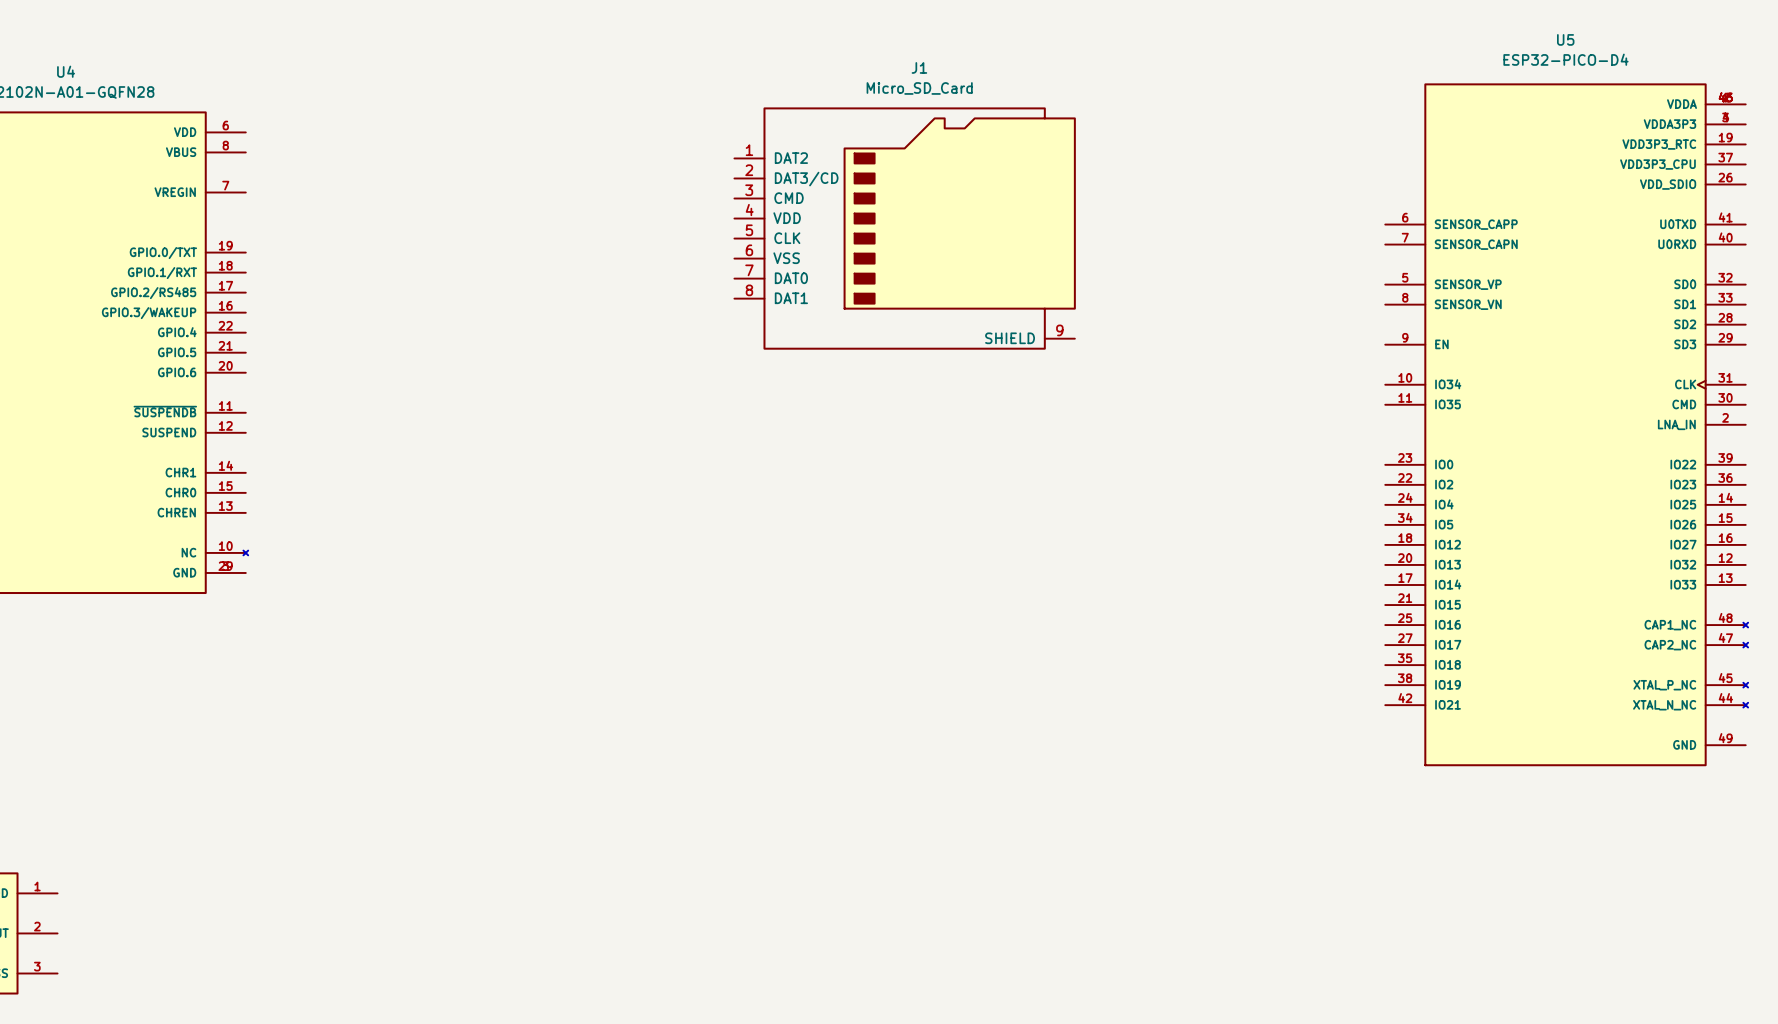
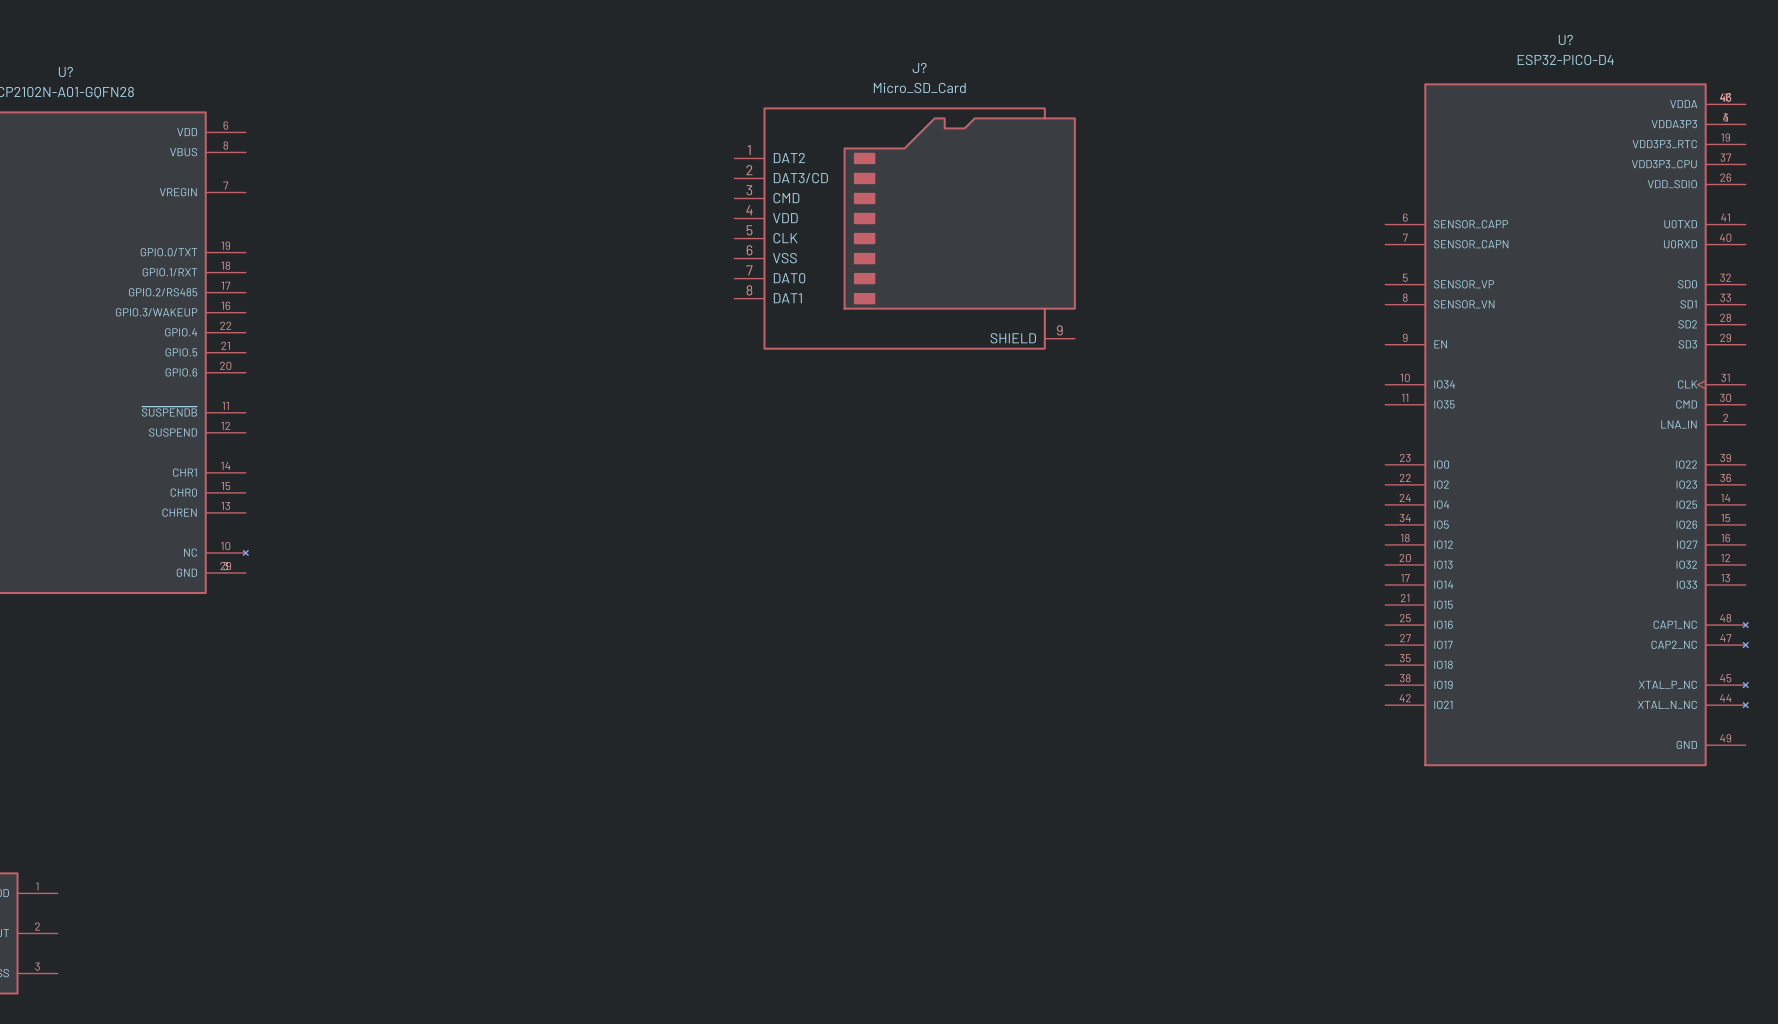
U5 name: U5 (1565, 39) -> U? (1565, 39)
J1 name: J1 (919, 67) -> J? (919, 67)
U4 name: U4 (66, 71) -> U? (65, 71)

